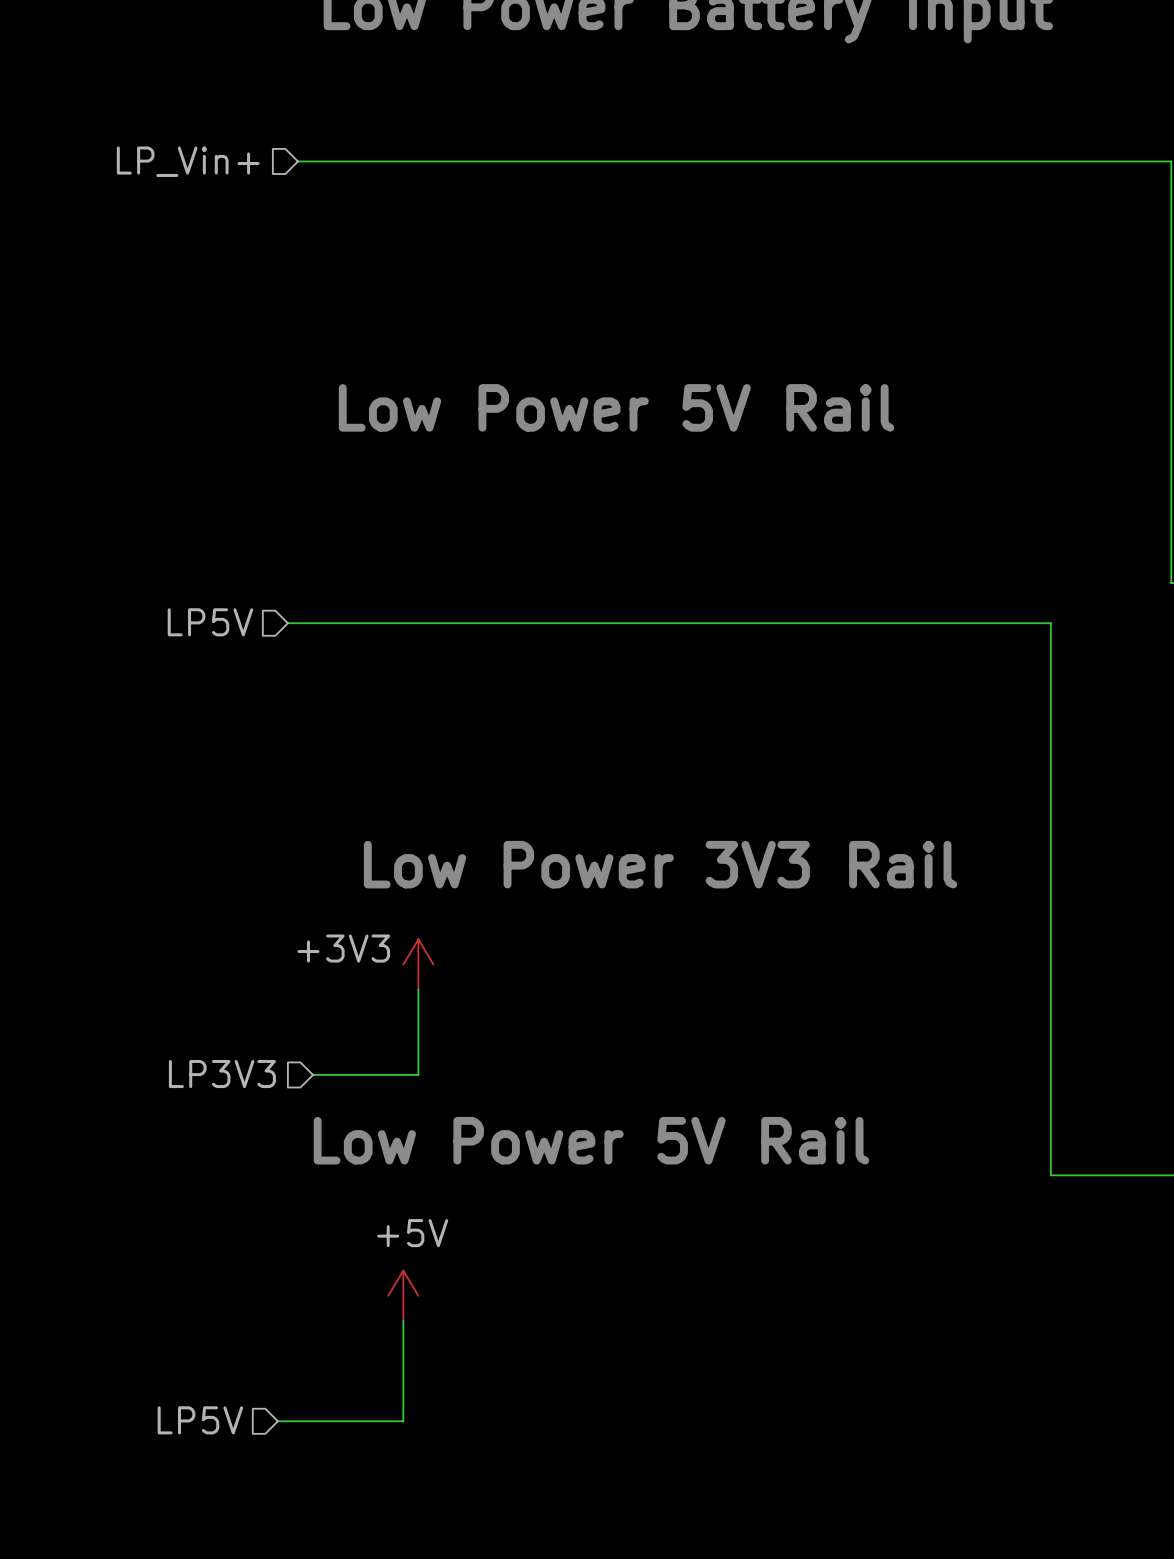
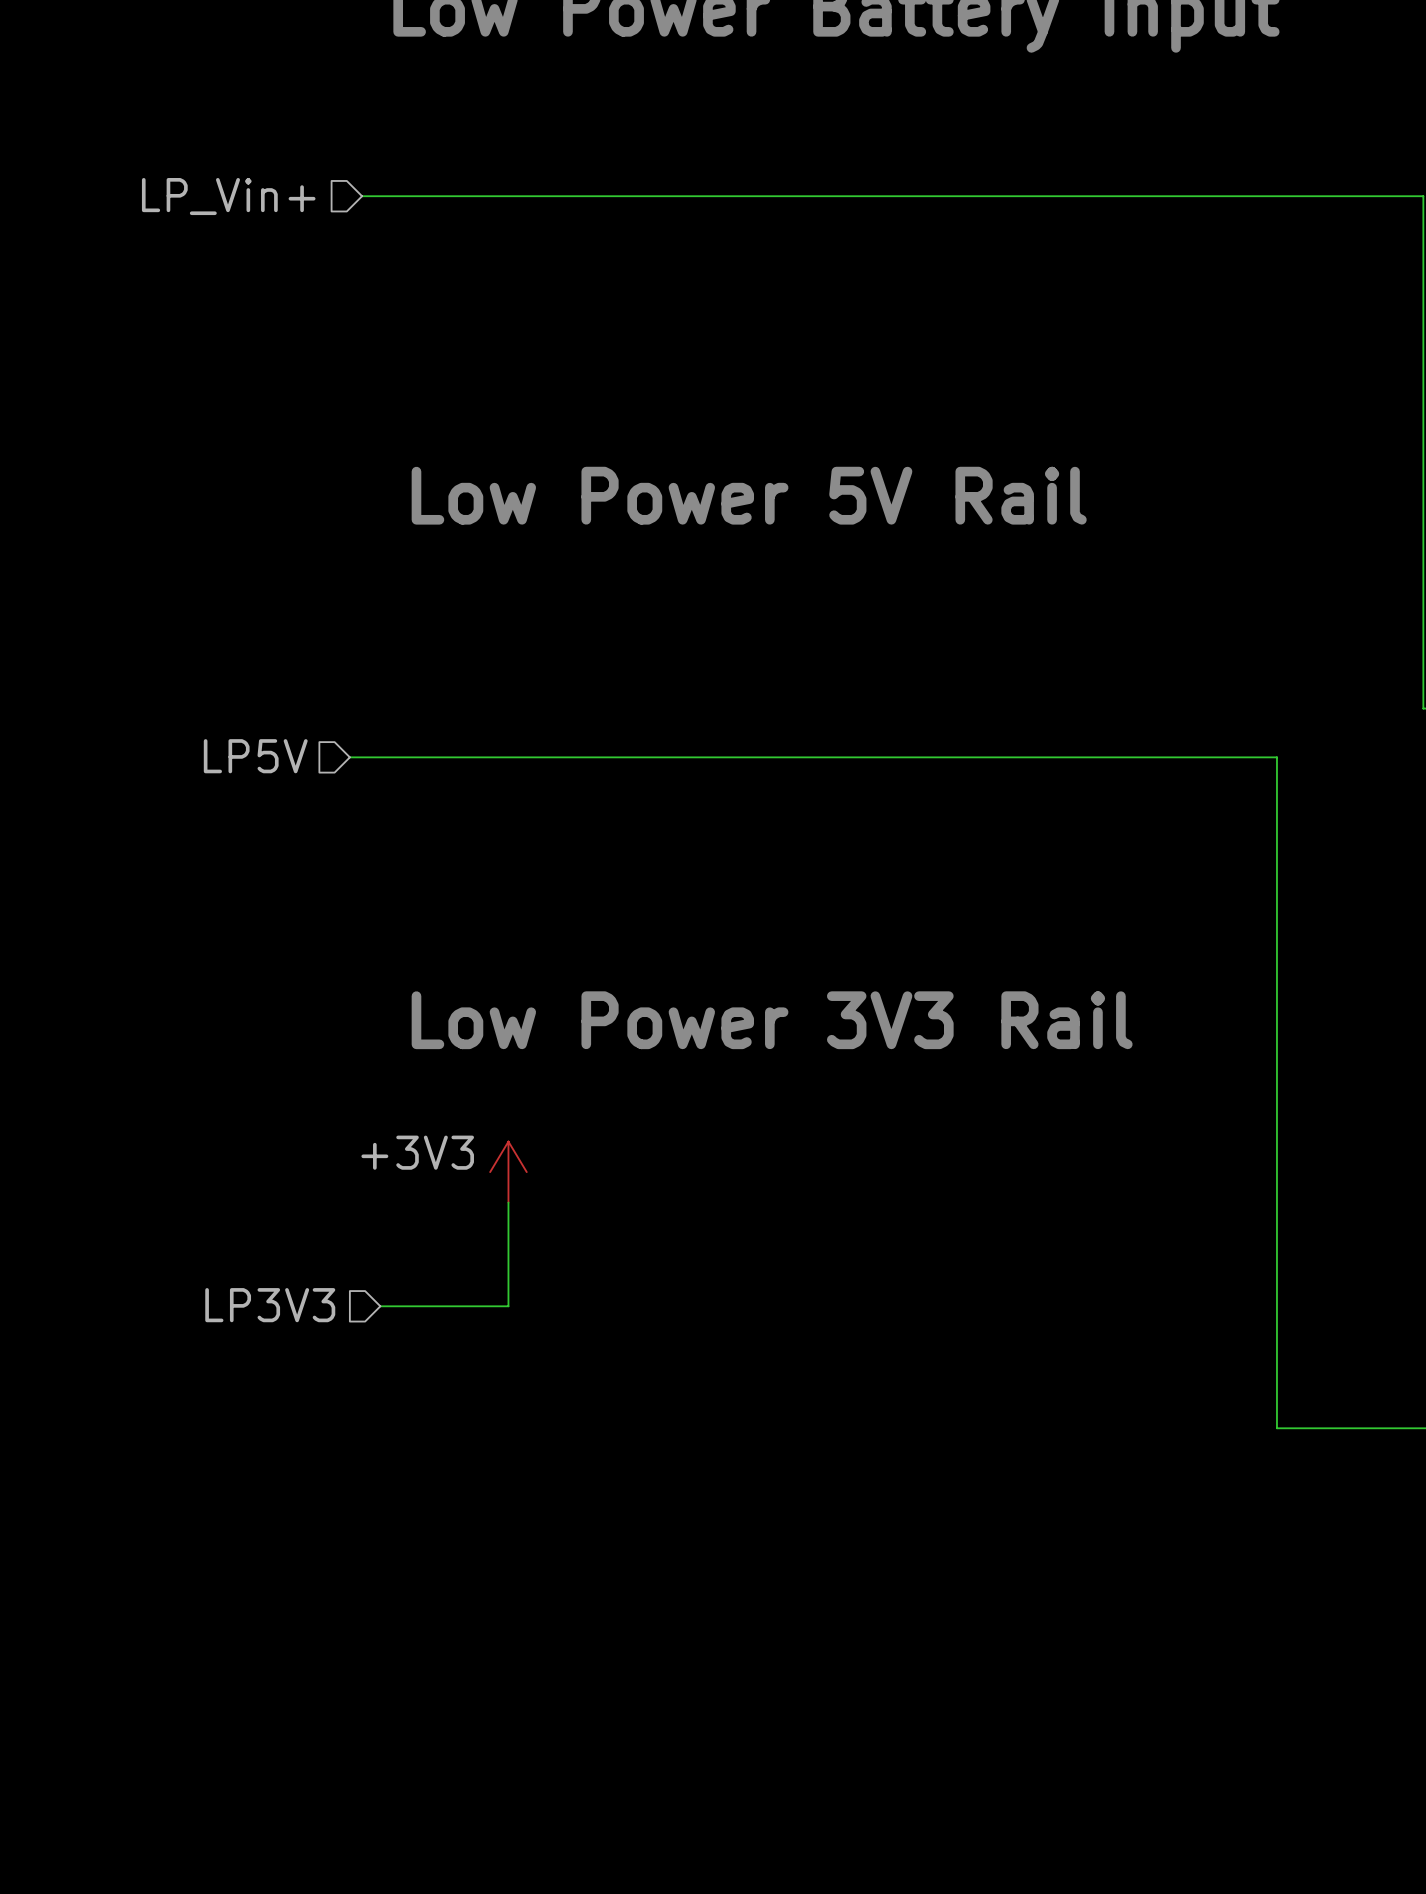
text position: Low Power 3V3 Rail (660, 864) -> Low Power 3V3 Rail (772, 1020)
text: Low Power 5V Rail (591, 1140) -> none
power symbol: +5V (403, 1295) -> none
wire: (403, 1320) (403, 1421) (277, 1421) -> none
hierarchical label: LP5V (200, 1420) -> none

